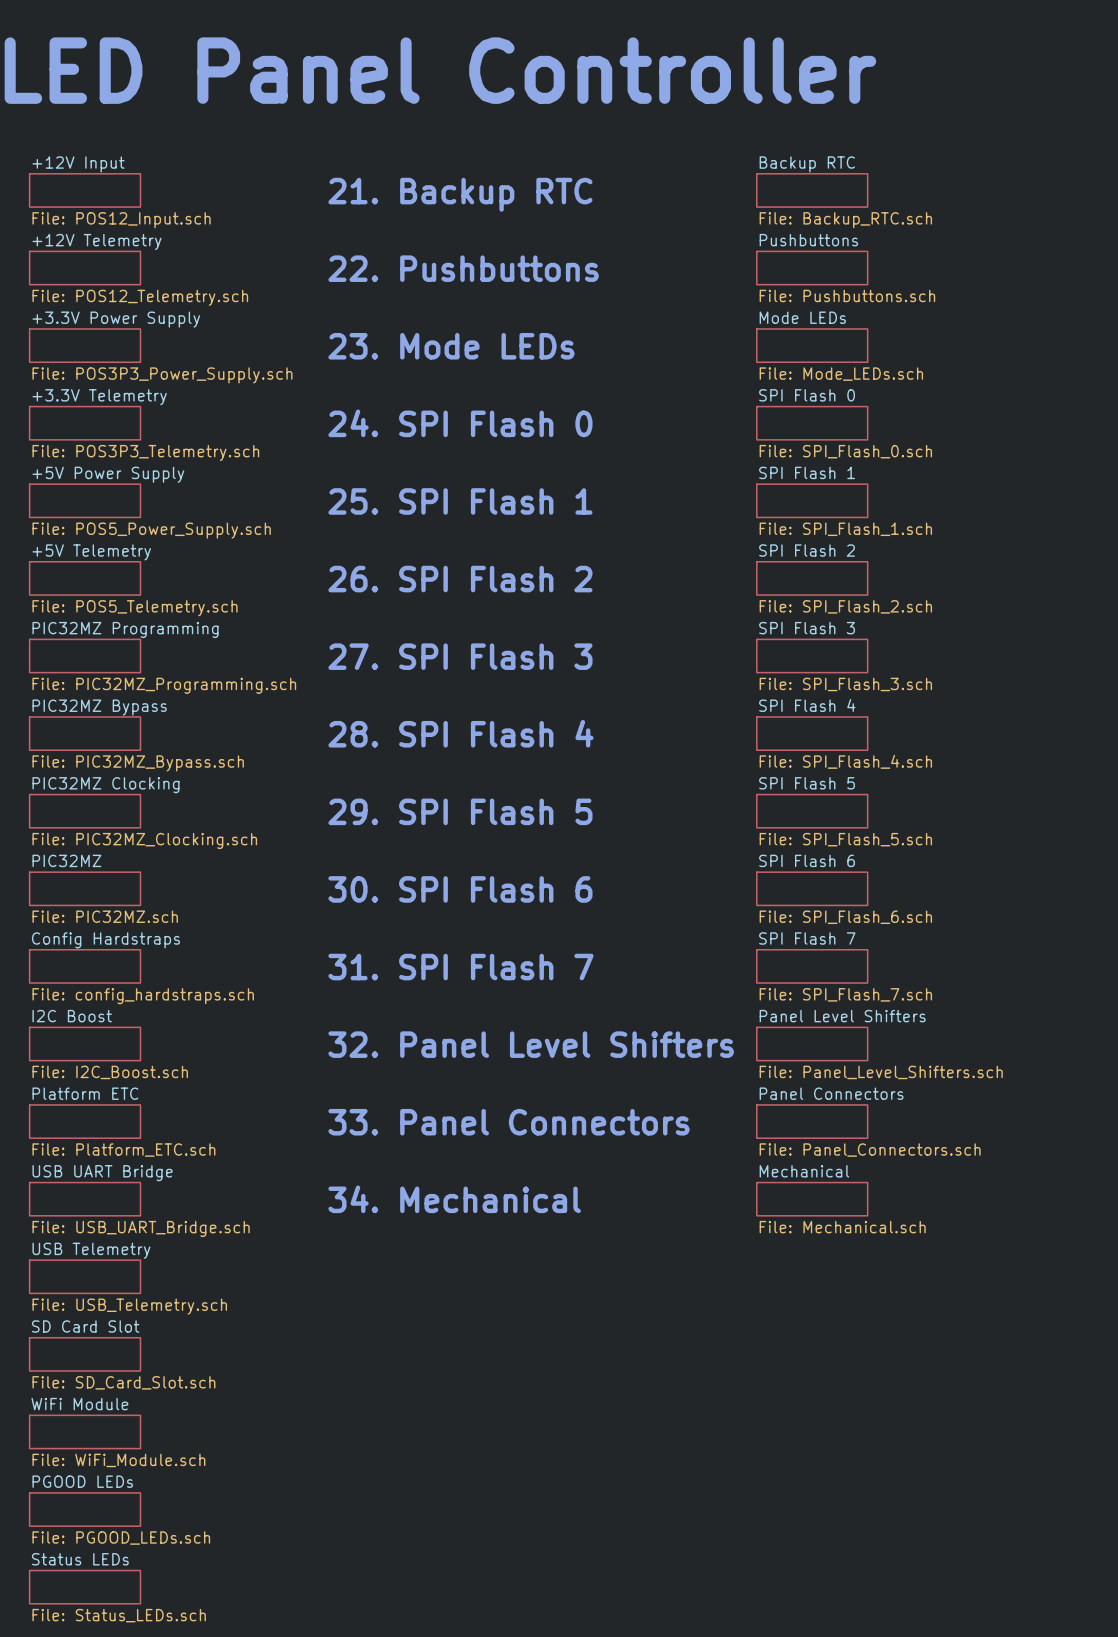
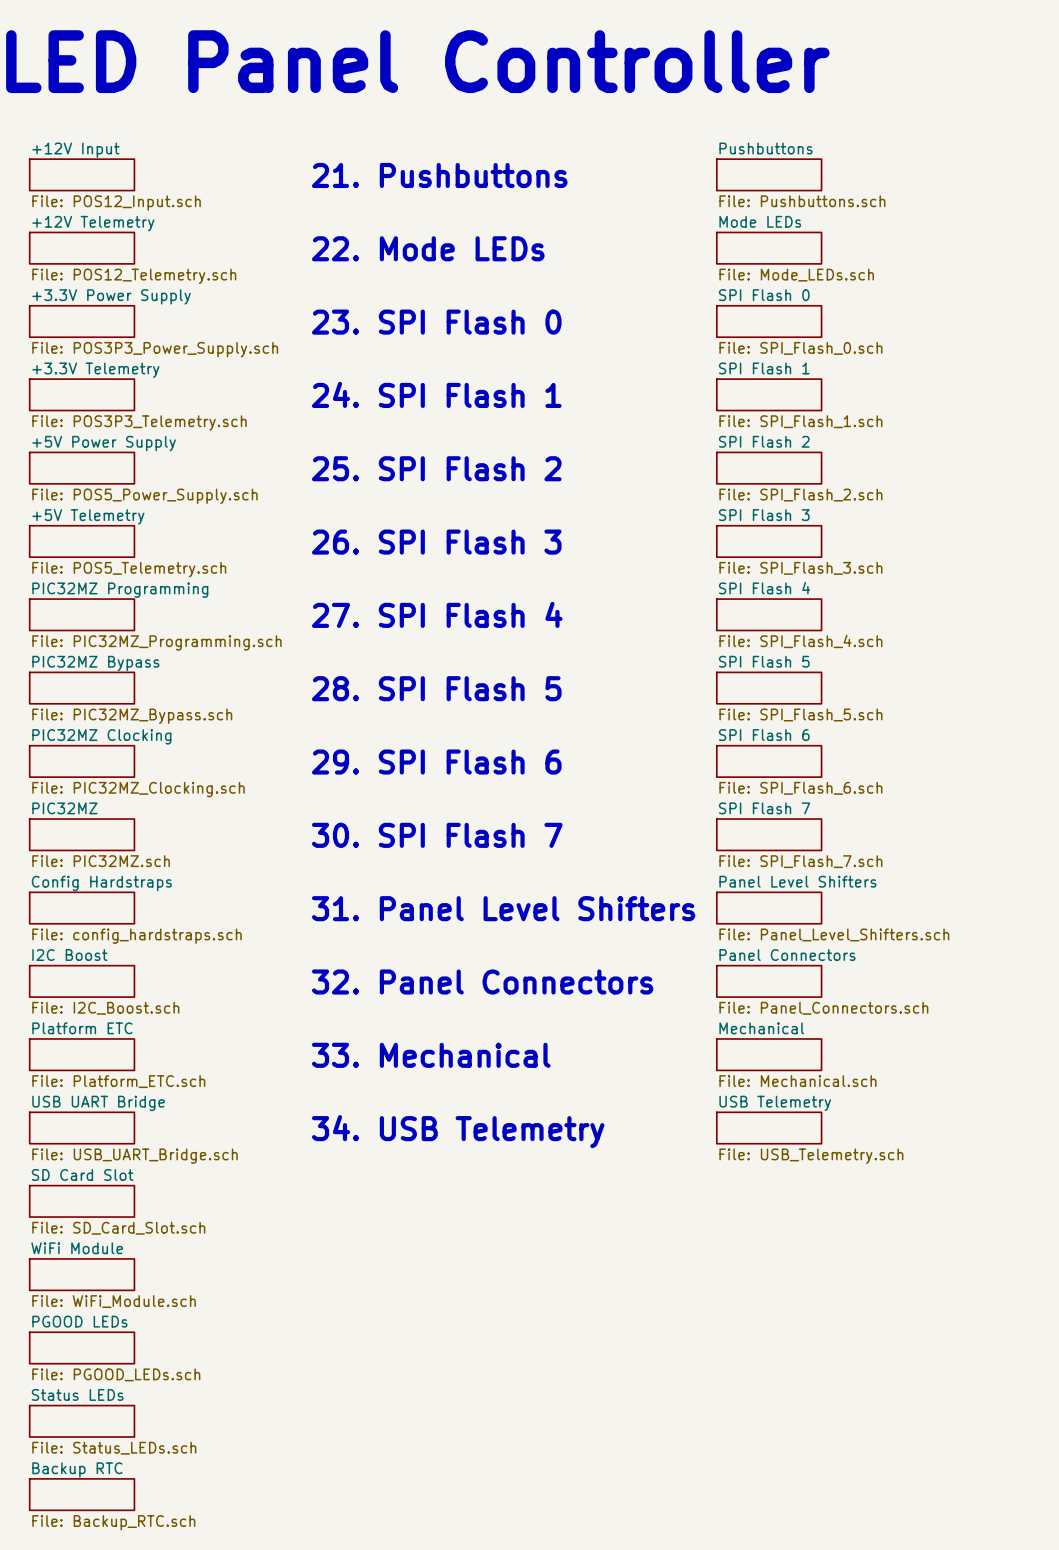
sheet Backup RTC name: Backup RTC (807, 164) -> Pushbuttons (766, 148)
text: 21. Backup RTC (460, 194) -> 21. Pushbuttons (439, 175)
sheet Backup RTC value: File: Backup_RTC.sch (845, 220) -> File: Pushbuttons.sch (802, 201)
sheet Pushbuttons name: Pushbuttons (808, 240) -> Mode LEDs (760, 221)
text: 22. Pushbuttons (463, 268) -> 22. Mode LEDs (428, 248)
sheet Pushbuttons value: File: Pushbuttons.sch (847, 295) -> File: Mode_LEDs.sch (796, 275)
sheet Mode LEDs name: Mode LEDs (802, 317) -> SPI Flash 0 (764, 295)
text: 23. Mode LEDs (451, 346) -> 23. SPI Flash 0 (436, 322)
sheet Mode LEDs value: File: Mode_LEDs.sch (841, 374) -> File: SPI_Flash_0.sch (800, 348)
sheet SPI Flash 0 name: SPI Flash 0 (807, 395) -> SPI Flash 1 (764, 368)
text: 24. SPI Flash 0 (460, 423) -> 24. SPI Flash 1 (436, 394)
sheet SPI Flash 0 value: File: SPI_Flash_0.sch (845, 451) -> File: SPI_Flash_1.sch (800, 421)
sheet SPI Flash 1 name: SPI Flash 1 (807, 472) -> SPI Flash 2 (764, 441)
text: 25. SPI Flash 1 (460, 501) -> 25. SPI Flash 2 (436, 468)
sheet SPI Flash 1 value: File: SPI_Flash_1.sch (845, 529) -> File: SPI_Flash_2.sch (800, 495)
sheet SPI Flash 2 name: SPI Flash 2 (807, 550) -> SPI Flash 3 (764, 515)
text: 26. SPI Flash 2 (460, 579) -> 26. SPI Flash 3 (436, 542)
sheet SPI Flash 2 value: File: SPI_Flash_2.sch (845, 606) -> File: SPI_Flash_3.sch (800, 568)
sheet SPI Flash 3 name: SPI Flash 3 (807, 628) -> SPI Flash 4 (764, 588)
text: 27. SPI Flash 3 (460, 656) -> 27. SPI Flash 4 (437, 614)
sheet SPI Flash 3 value: File: SPI_Flash_3.sch (845, 684) -> File: SPI_Flash_4.sch (800, 641)
sheet SPI Flash 4 name: SPI Flash 4 (807, 705) -> SPI Flash 5 (764, 661)
text: 28. SPI Flash 4 (460, 733) -> 28. SPI Flash 5 (436, 688)
sheet SPI Flash 4 value: File: SPI_Flash_4.sch (845, 761) -> File: SPI_Flash_5.sch (800, 714)
sheet SPI Flash 5 name: SPI Flash 5 (807, 783) -> SPI Flash 6 (764, 735)
text: 29. SPI Flash 5 (460, 811) -> 29. SPI Flash 6 (436, 762)
sheet SPI Flash 5 value: File: SPI_Flash_5.sch (845, 839) -> File: SPI_Flash_6.sch (800, 788)
sheet SPI Flash 6 name: SPI Flash 6 (807, 860) -> SPI Flash 7 (764, 808)
text: 30. SPI Flash 6 (460, 889) -> 30. SPI Flash 7 (437, 835)
sheet SPI Flash 6 value: File: SPI_Flash_6.sch (845, 917) -> File: SPI_Flash_7.sch (800, 861)
sheet SPI Flash 7 name: SPI Flash 7 (807, 938) -> Panel Level Shifters (797, 881)
text: 31. SPI Flash 7 (460, 967) -> 31. Panel Level Shifters (503, 908)
sheet SPI Flash 7 value: File: SPI_Flash_7.sch (845, 994) -> File: Panel_Level_Shifters.sch (834, 934)
sheet Panel Level Shifters name: Panel Level Shifters (842, 1016) -> Panel Connectors (787, 955)
text: 32. Panel Level Shifters (531, 1044) -> 32. Panel Connectors (482, 981)
sheet Panel Level Shifters value: File: Panel_Level_Shifters.sch (881, 1072) -> File: Panel_Connectors.sch (823, 1008)
sheet Panel Connectors name: Panel Connectors (831, 1093) -> Mechanical (761, 1028)
text: 33. Panel Connectors (508, 1122) -> 33. Mechanical (431, 1055)
sheet Panel Connectors value: File: Panel_Connectors.sch (870, 1150) -> File: Mechanical.sch (797, 1081)
sheet Mechanical name: Mechanical (804, 1171) -> USB Telemetry (775, 1103)
text: 34. Mechanical (454, 1199) -> 34. USB Telemetry (458, 1131)
sheet Mechanical value: File: Mechanical.sch (842, 1227) -> File: USB_Telemetry.sch (811, 1156)
sheet USB Telemetry name: USB Telemetry (91, 1250) -> SD Card Slot (82, 1174)
sheet USB Telemetry value: File: USB_Telemetry.sch (129, 1306) -> File: SD_Card_Slot.sch (118, 1228)
sheet SD Card Slot name: SD Card Slot (85, 1326) -> WiFi Module (77, 1248)
sheet SD Card Slot value: File: SD_Card_Slot.sch (123, 1382) -> File: WiFi_Module.sch (114, 1301)
sheet WiFi Module name: WiFi Module (79, 1404) -> PGOOD LEDs (79, 1321)
sheet WiFi Module value: File: WiFi_Module.sch (118, 1460) -> File: PGOOD_LEDs.sch (116, 1374)
sheet PGOOD LEDs name: PGOOD LEDs (82, 1481) -> Status LEDs (77, 1394)
sheet PGOOD LEDs value: File: PGOOD_LEDs.sch (121, 1538) -> File: Status_LEDs.sch (114, 1448)
sheet Status LEDs name: Status LEDs (80, 1559) -> Backup RTC (77, 1470)
sheet Status LEDs value: File: Status_LEDs.sch (119, 1615) -> File: Backup_RTC.sch (113, 1522)

